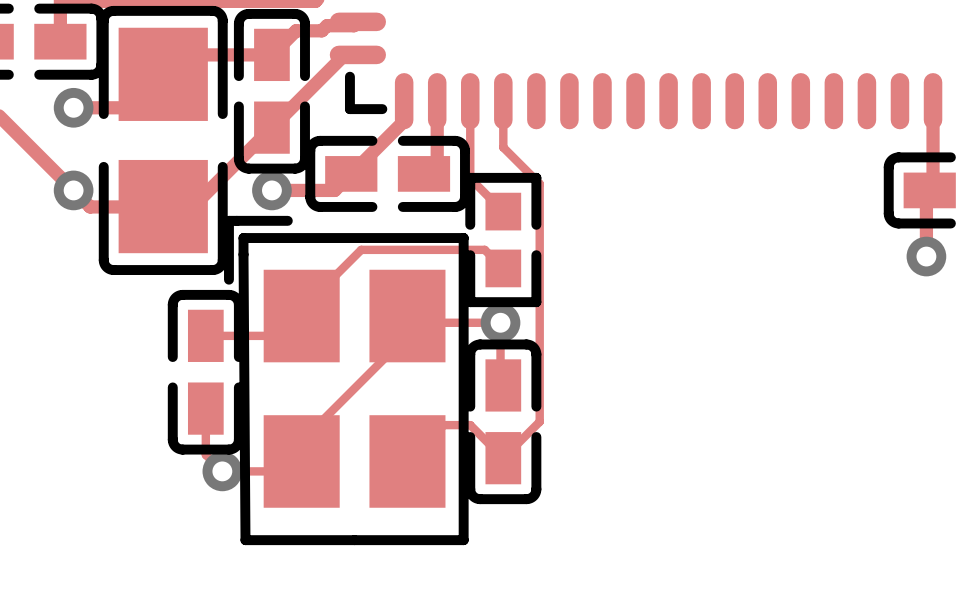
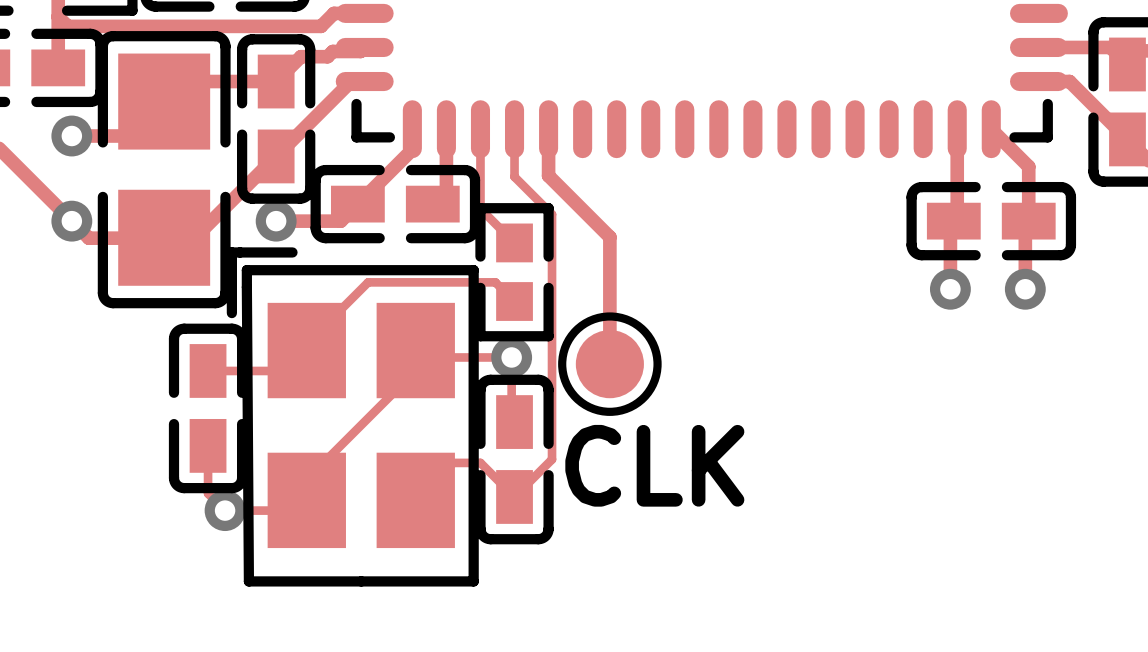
top track: none -> (548, 129) (548, 175) (609, 237) (609, 364)
part: none -> (609, 364)
text: none -> CLK (654, 465)

